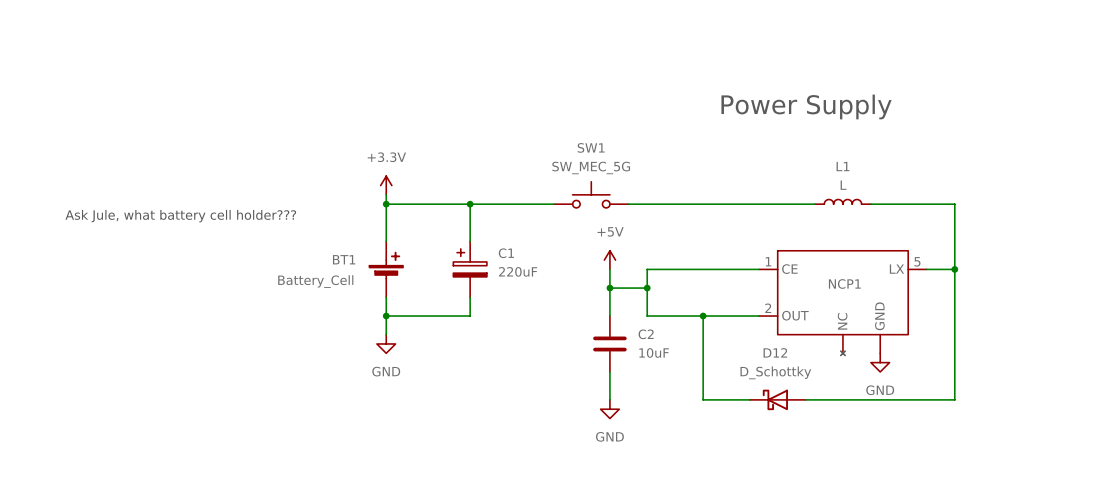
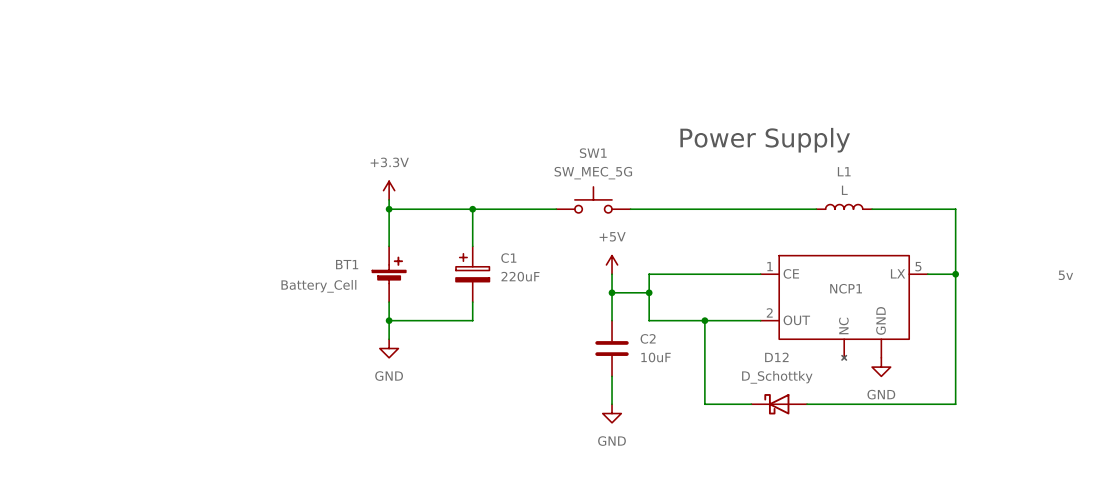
text position: Power Supply (806, 106) -> Power Supply (765, 140)
text: Ask Jule, what battery cell holder??? (180, 216) -> none
label: none -> 5v (1065, 275)

